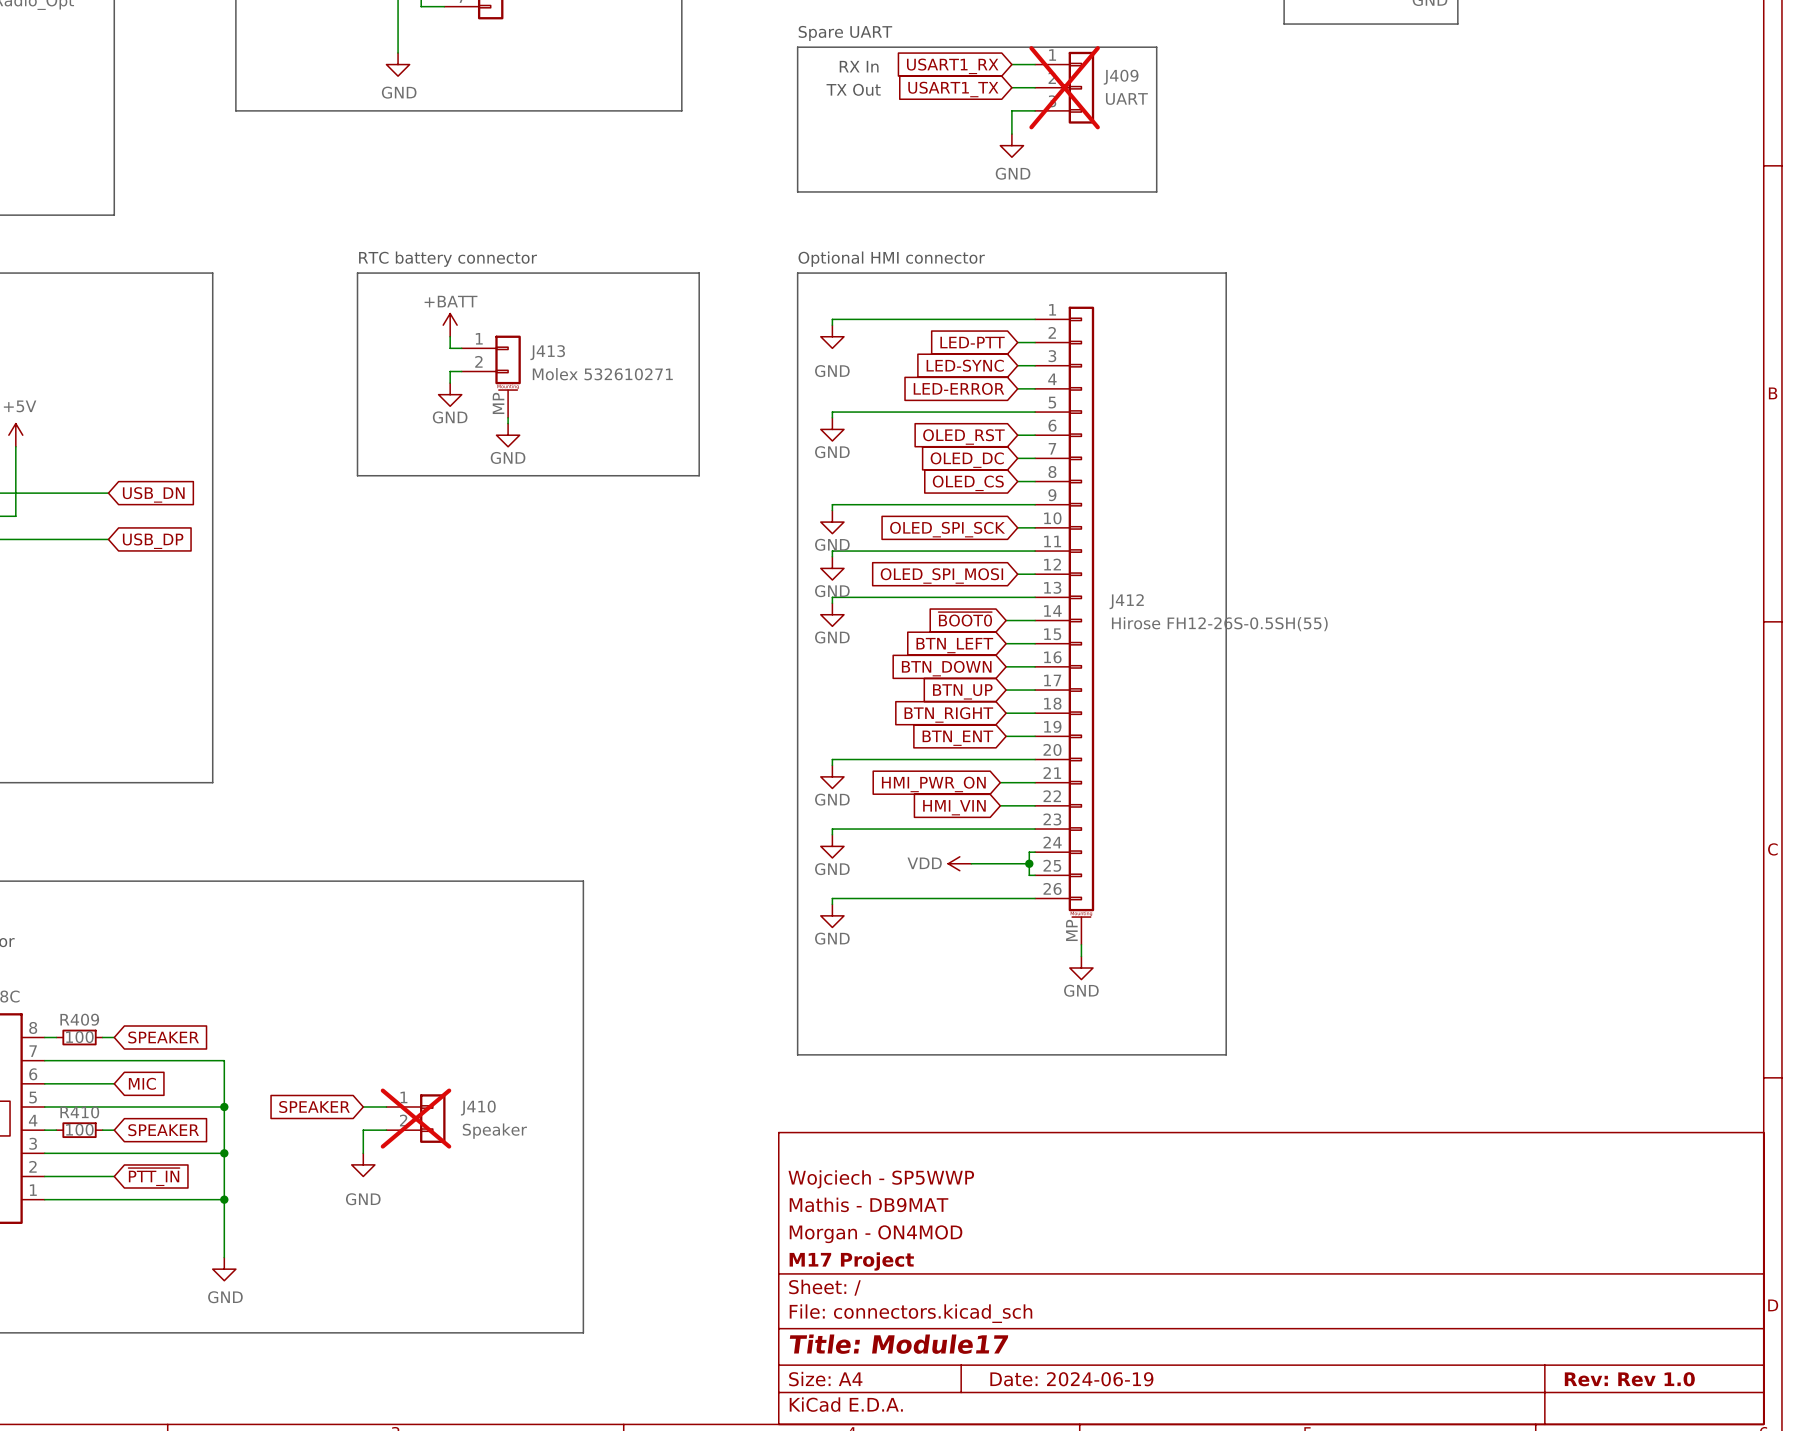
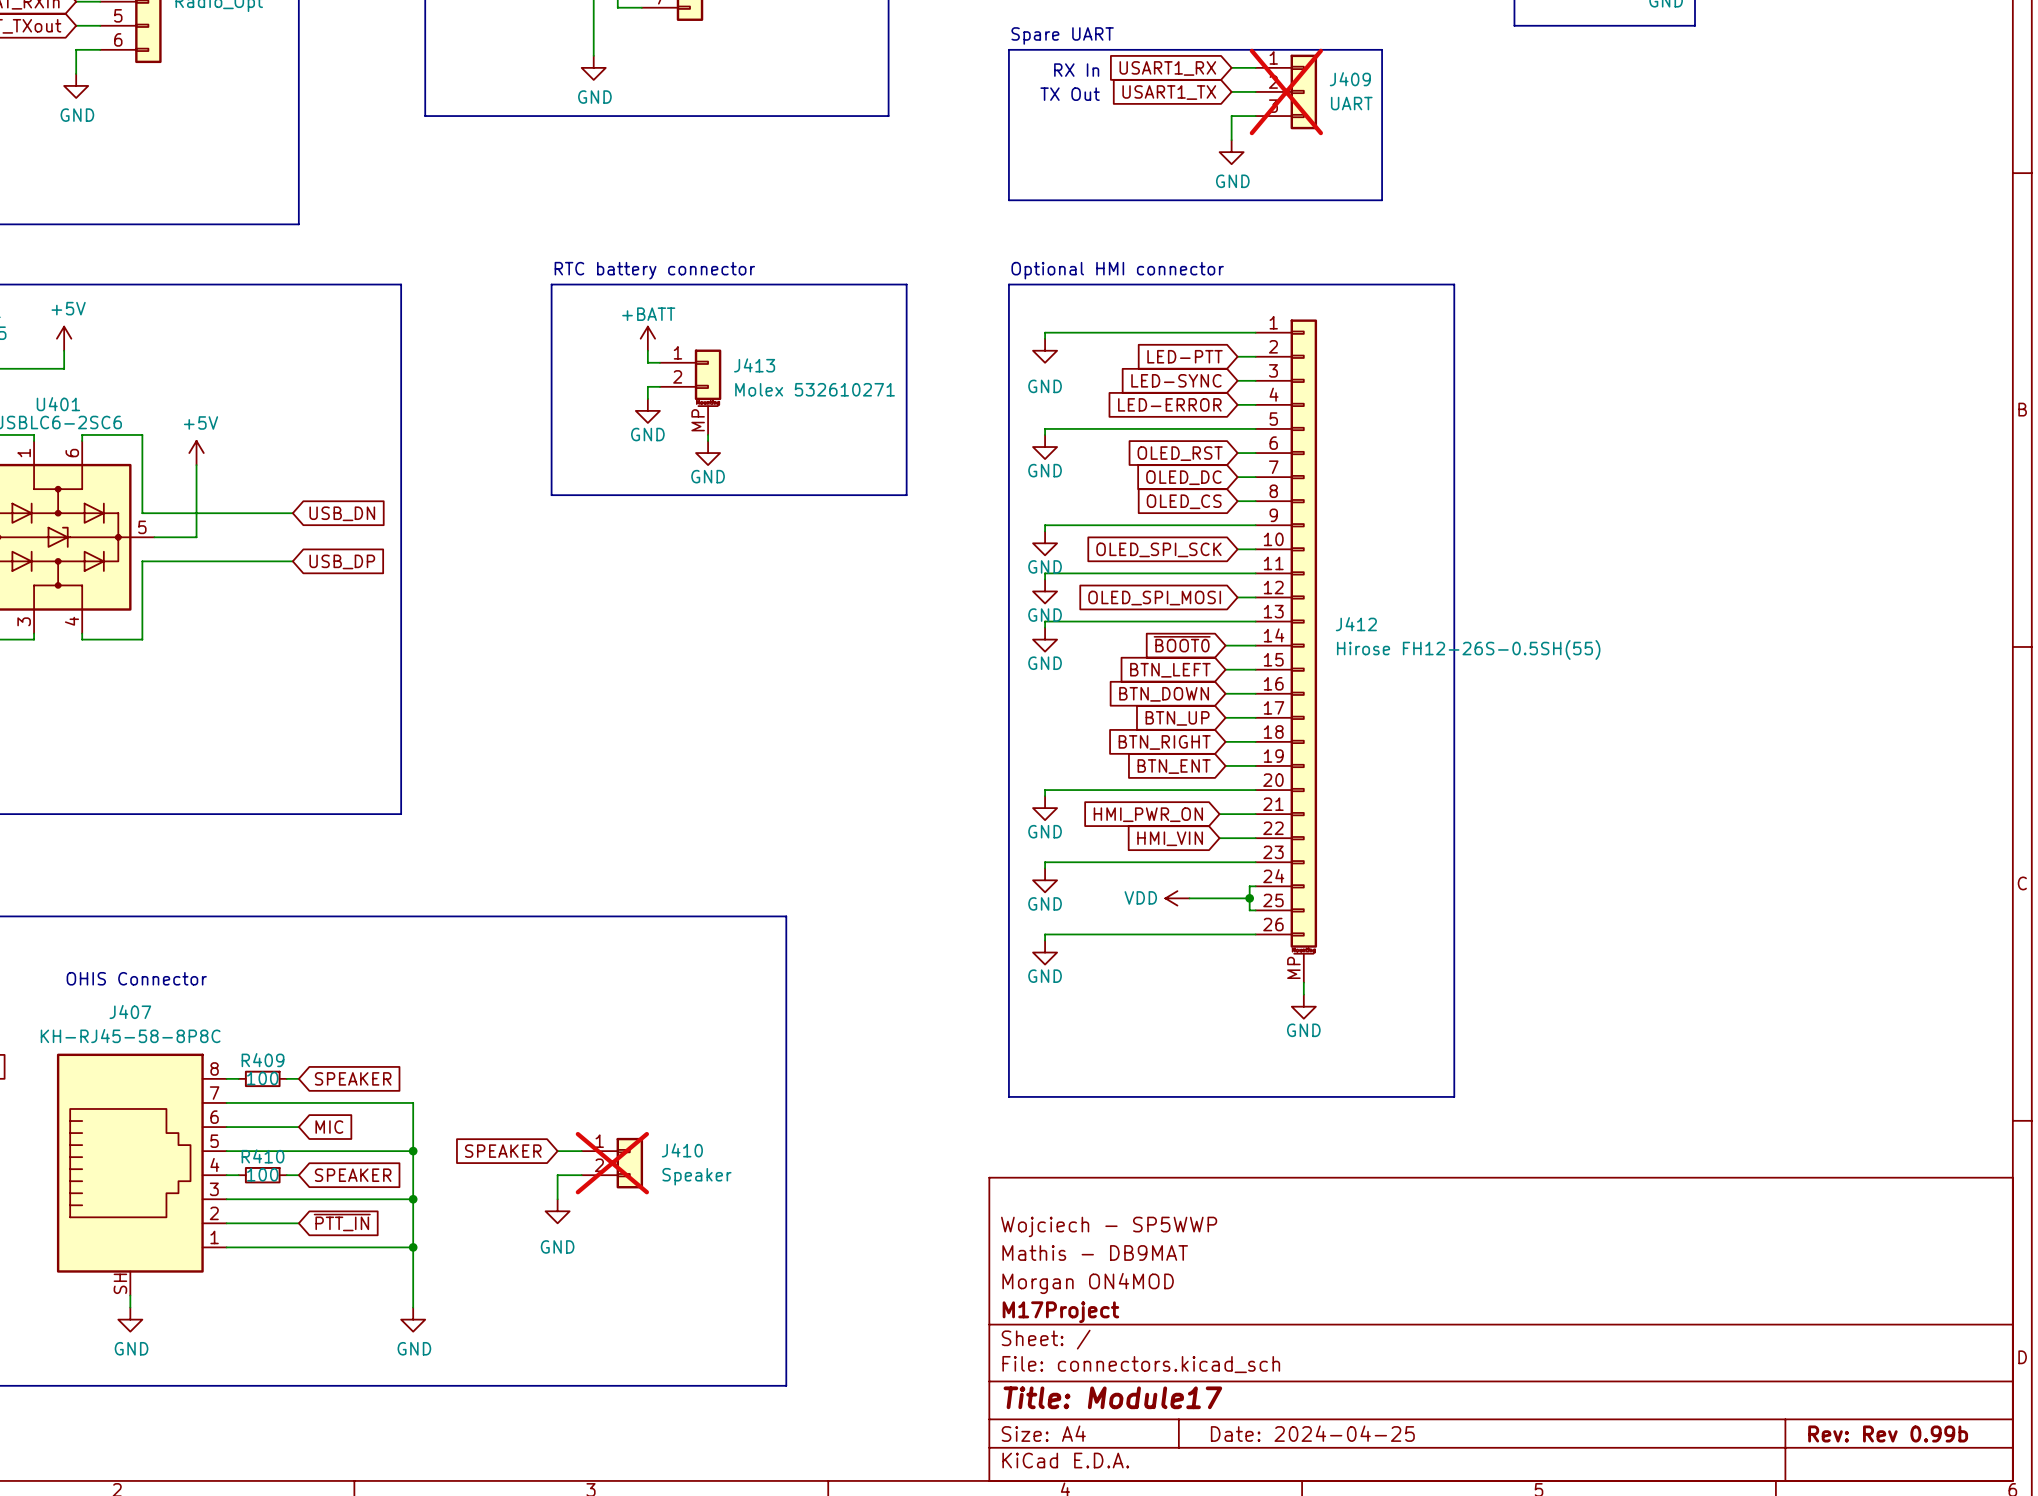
title block: Morgan - ON4MOD (876, 1234) -> Morgan ON4MOD (1088, 1283)
title block: M17 Project (851, 1261) -> M17Project (1060, 1312)
title block: Date: 2024-06-19 (1071, 1379) -> Date: 2024-04-25 (1312, 1433)
title block: Rev: Rev 1.0 (1629, 1379) -> Rev: Rev 0.99b (1888, 1433)

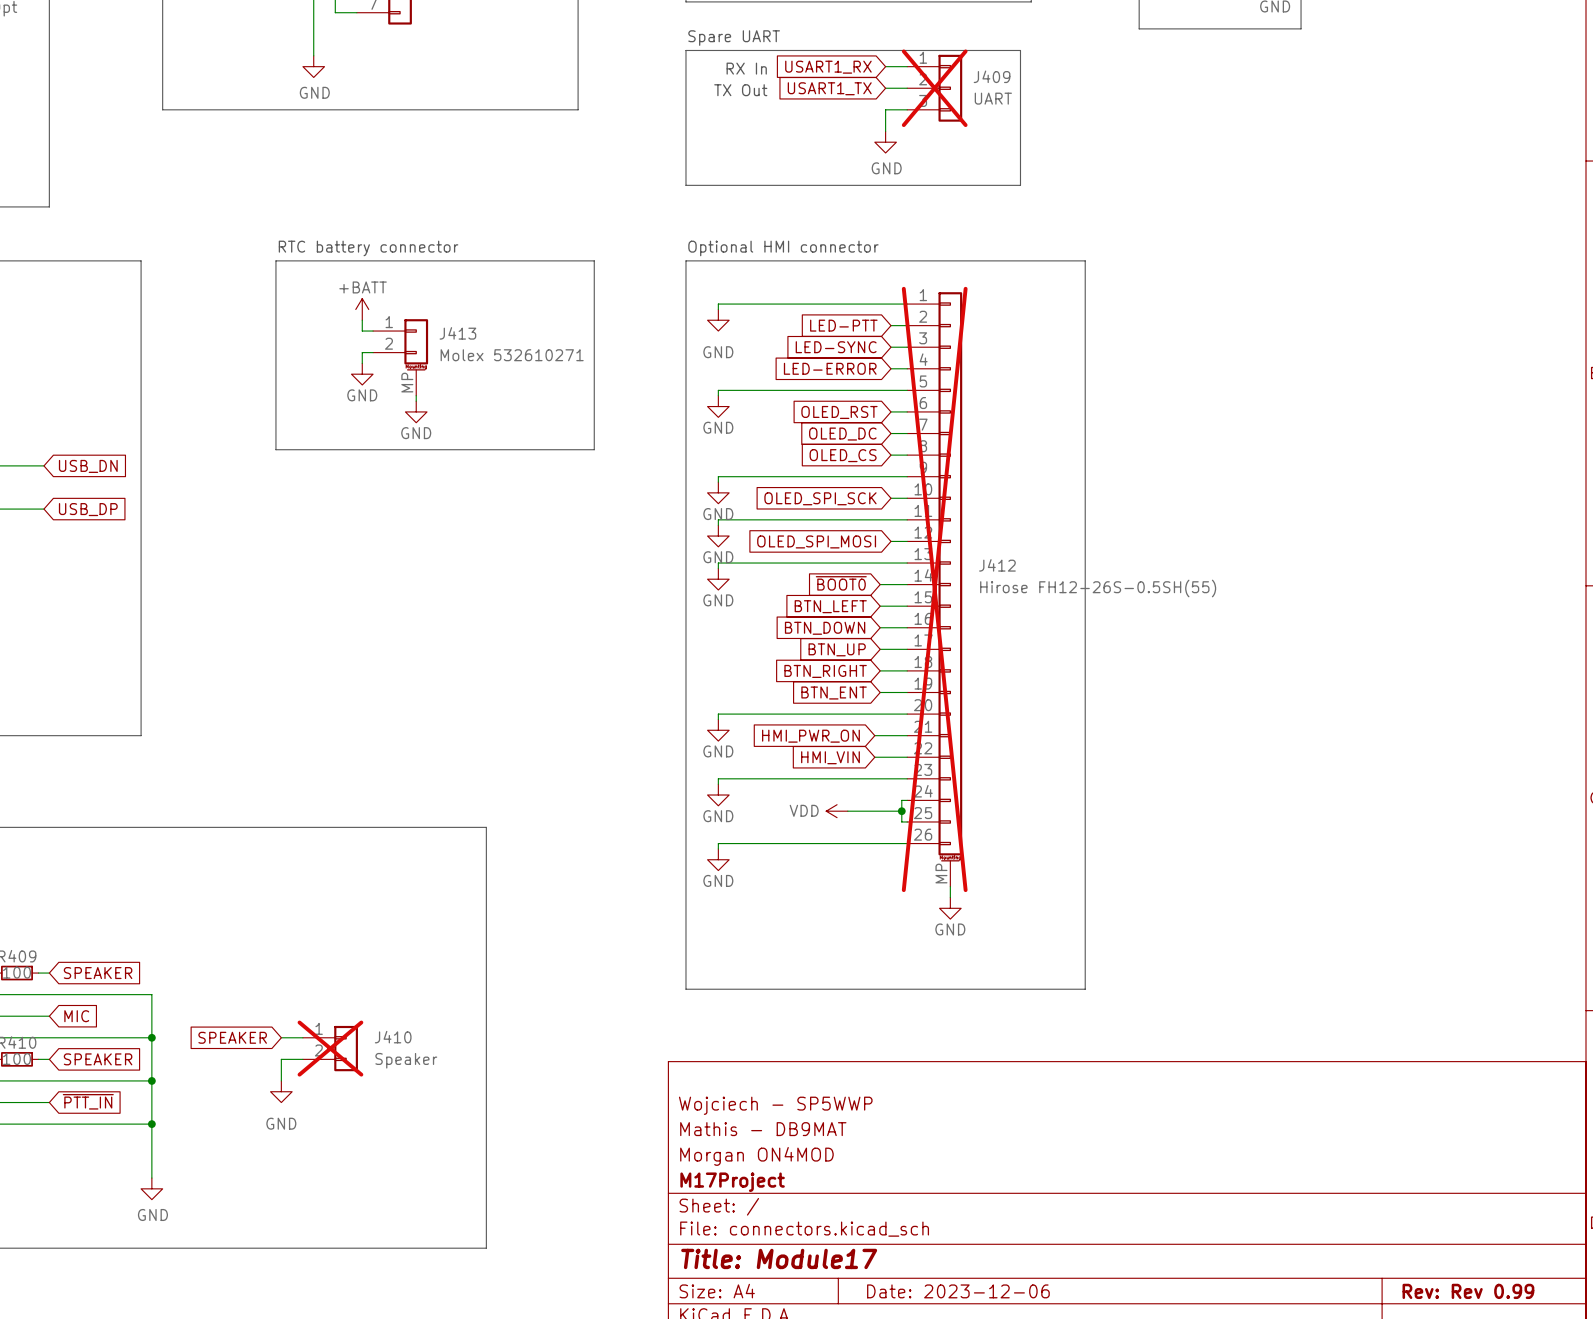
J412 do-not-place cross: none -> (934, 589)
title block: Date: 2024-04-25 (1312, 1433) -> Date: 2023-12-06 (958, 1291)
title block: Rev: Rev 0.99b (1888, 1433) -> Rev: Rev 0.99 (1468, 1291)

